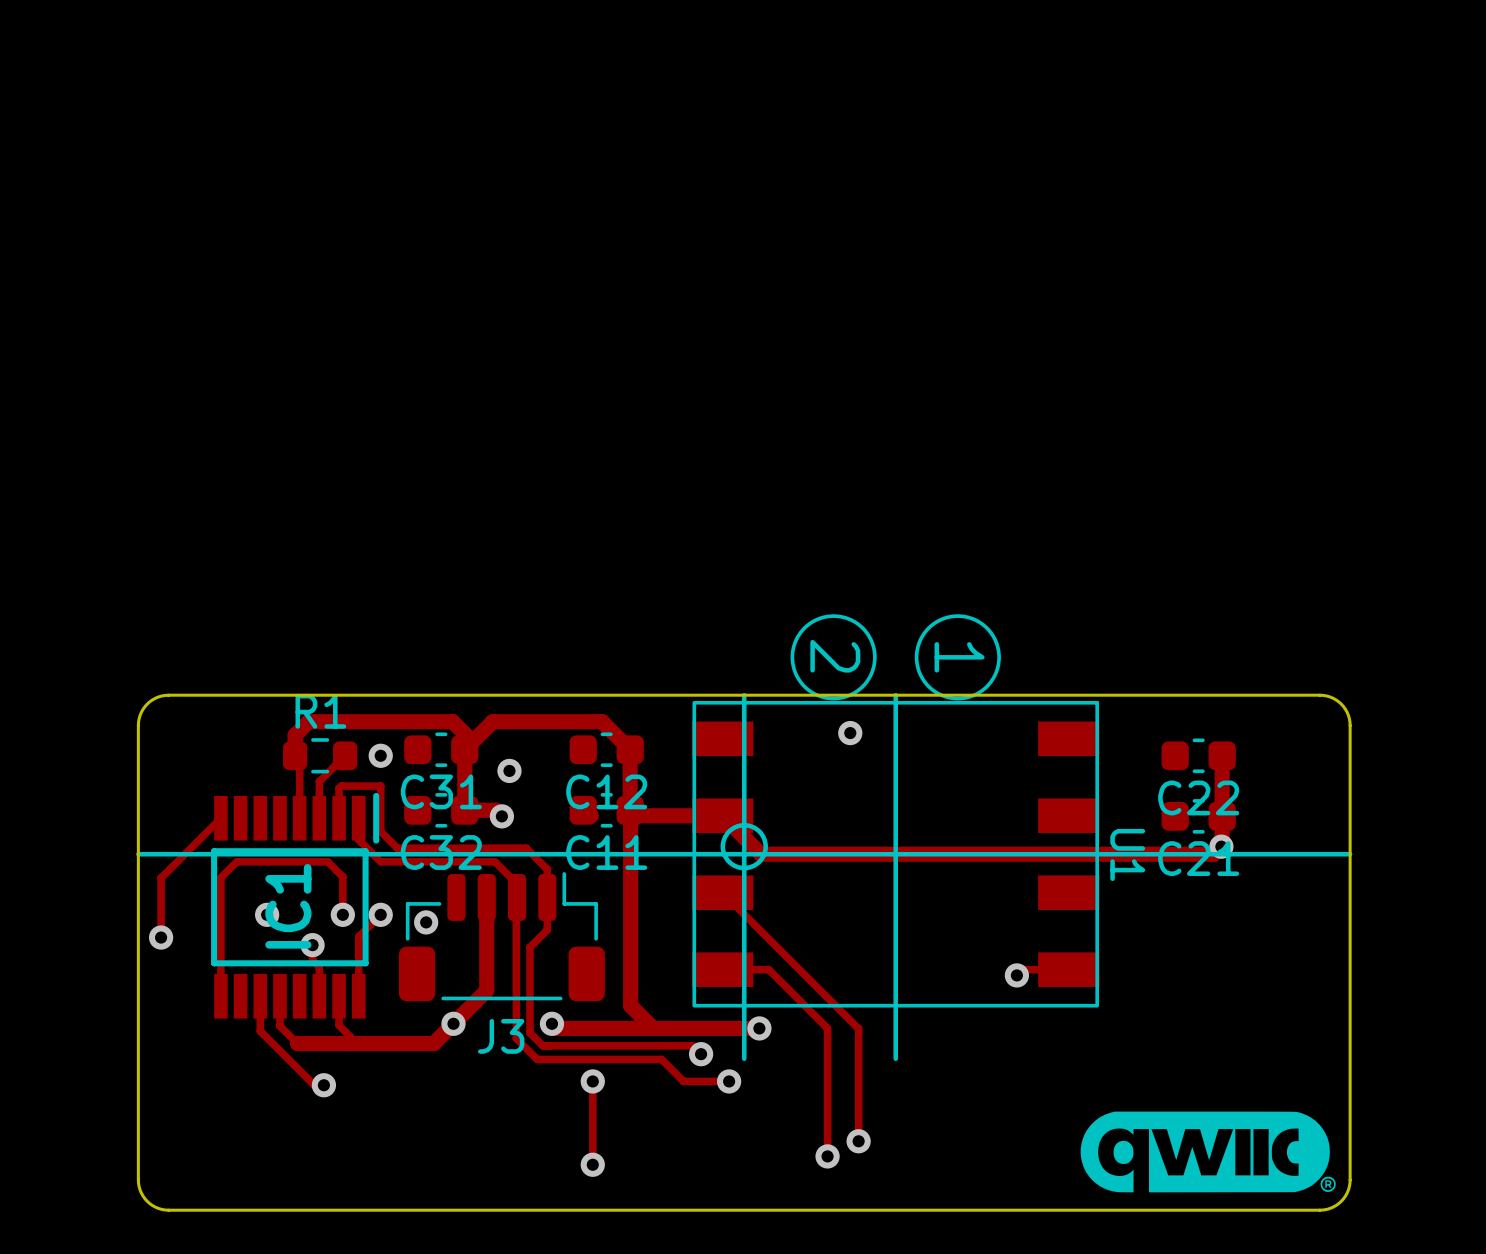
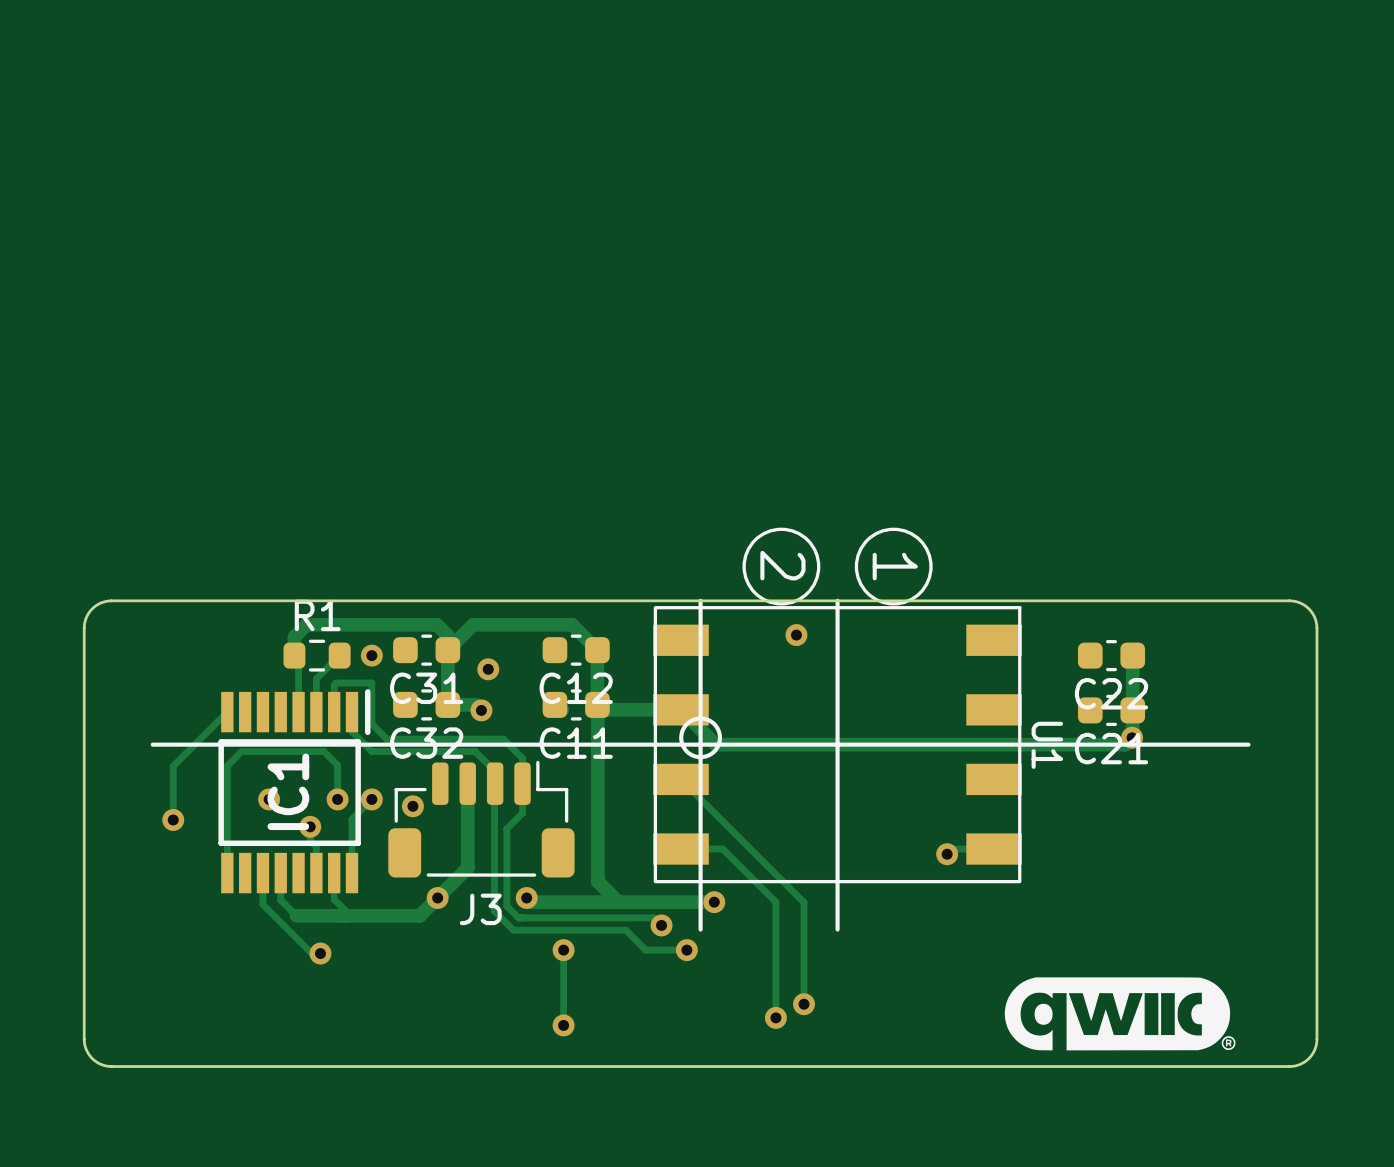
board edge: (168, 695) (155, 698) (147, 704) (140, 715) (138, 725) (138, 1183) (141, 1193) (147, 1201) (155, 1207) (168, 1210) -> (180, 600) (105, 601) (97, 605) (90, 611) (85, 619) (84, 628) (84, 1045) (92, 1058) (105, 1065) (180, 1066)
board edge: (1319, 695) (1332, 698) (1341, 704) (1347, 712) (1350, 725) (1349, 1183) (1345, 1196) (1338, 1203) (1329, 1208) (1319, 1210) -> (1221, 600) (1295, 601) (1304, 605) (1310, 611) (1315, 619) (1316, 628) (1316, 1045) (1308, 1058) (1295, 1065) (1221, 1066)

